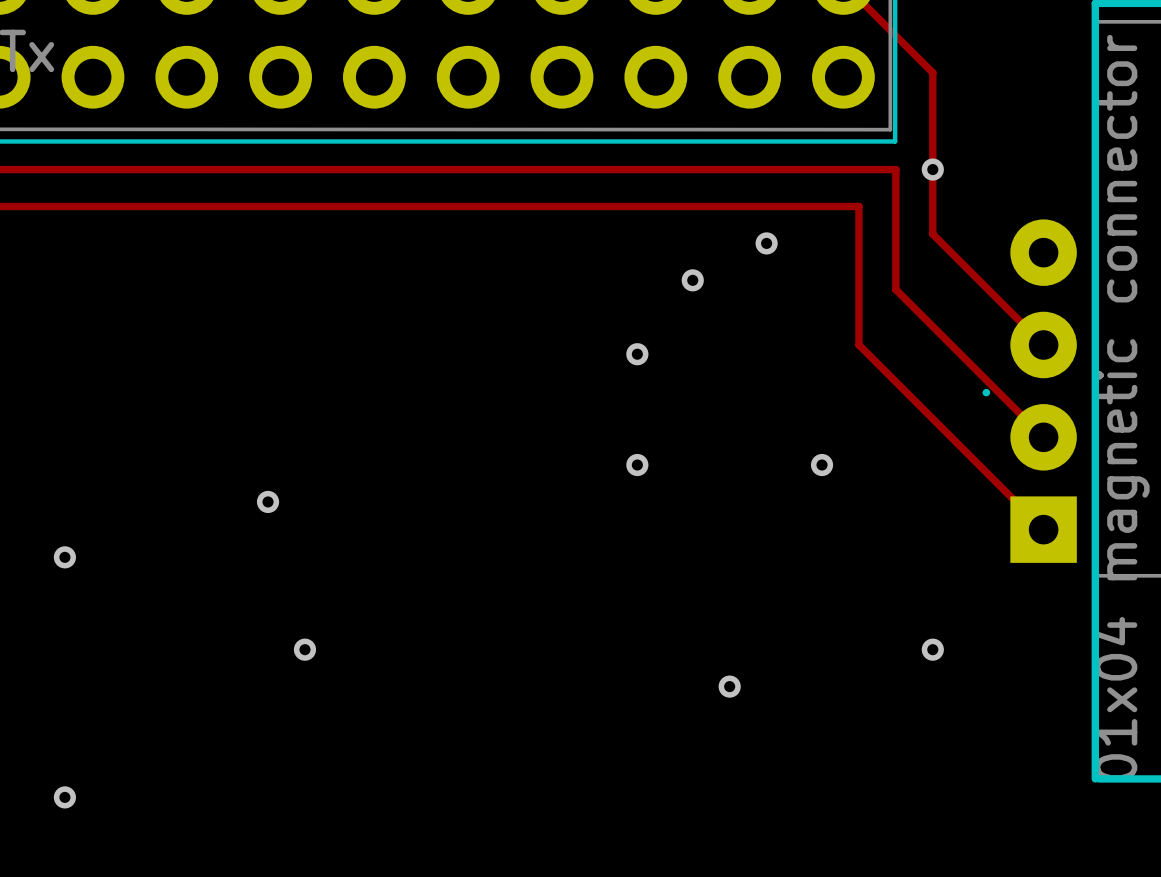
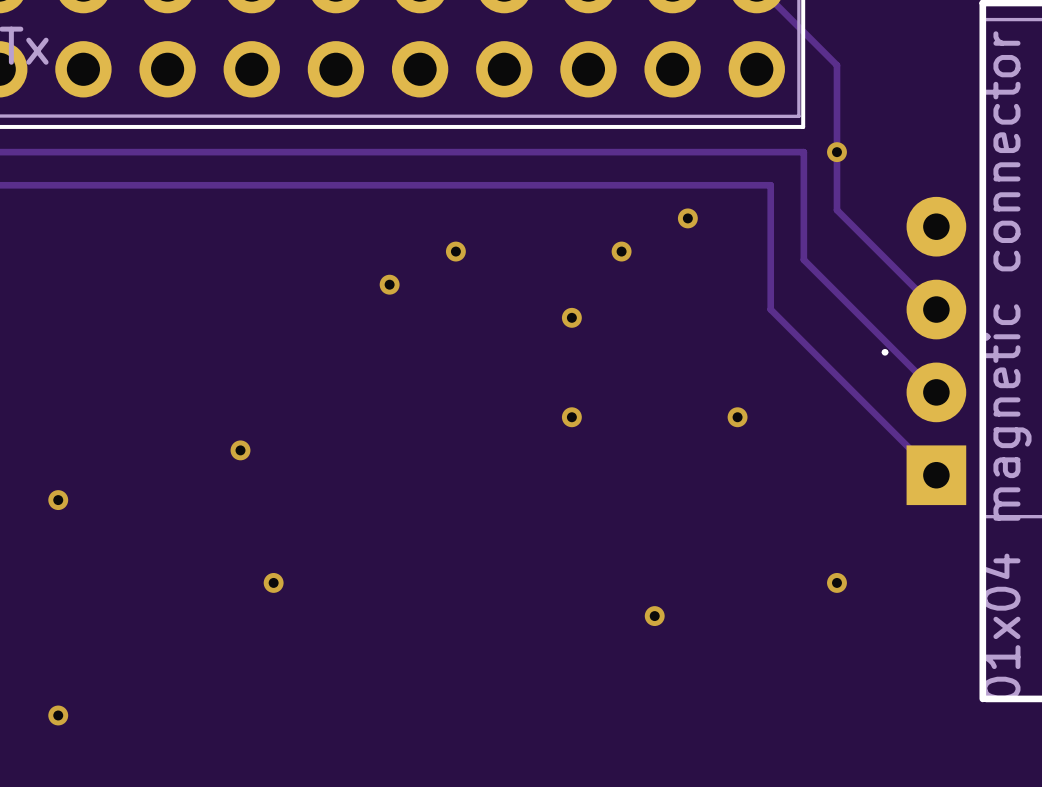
via: none -> (455, 251)
via: none -> (389, 284)

